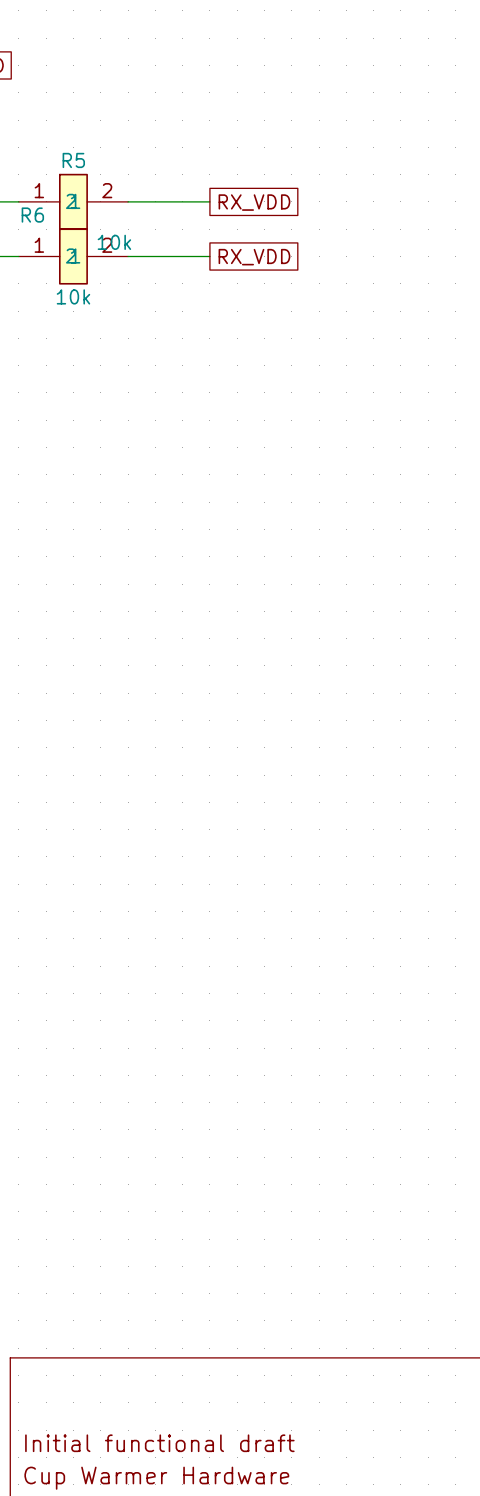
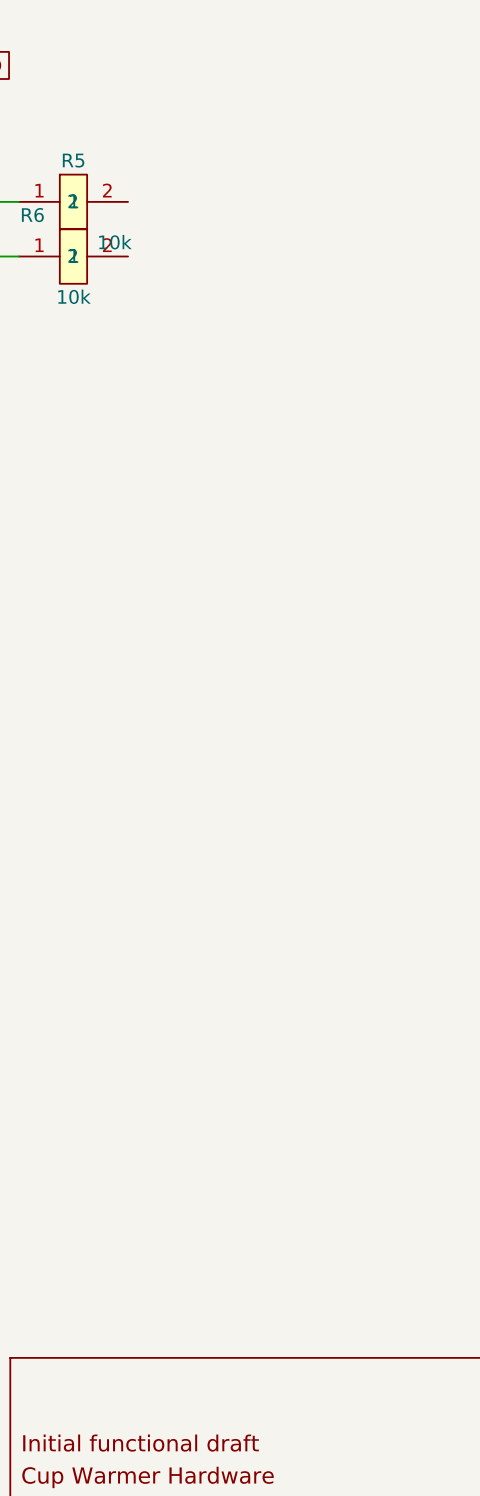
wire: (128, 201) (209, 201) -> none
global label: RX_VDD (254, 202) -> none
wire: (128, 256) (209, 256) -> none
global label: RX_VDD (254, 257) -> none

